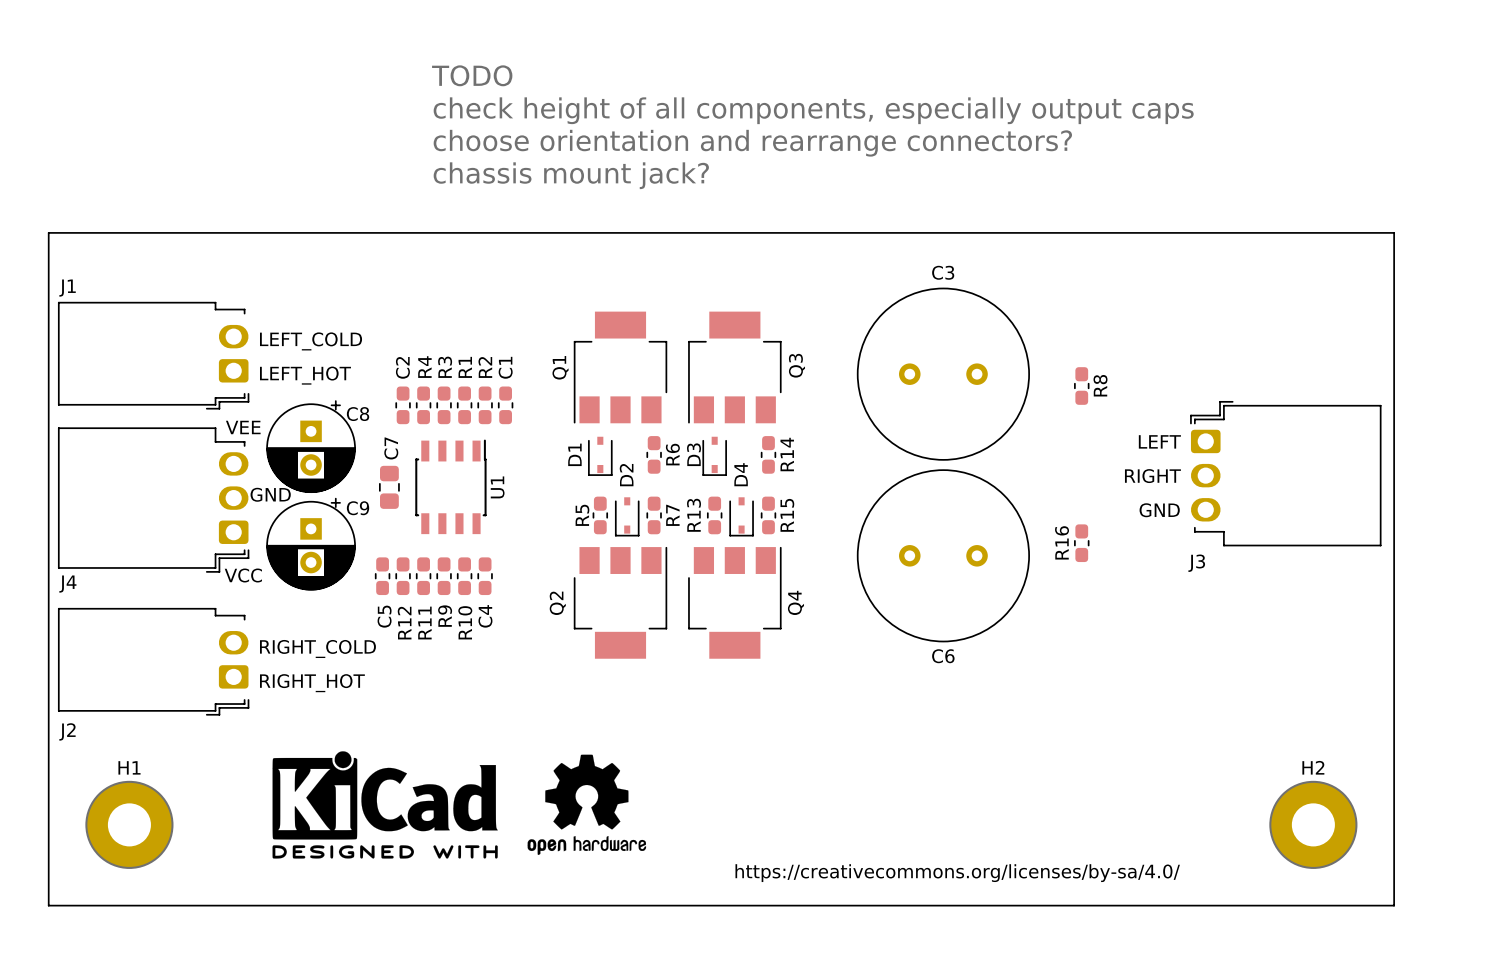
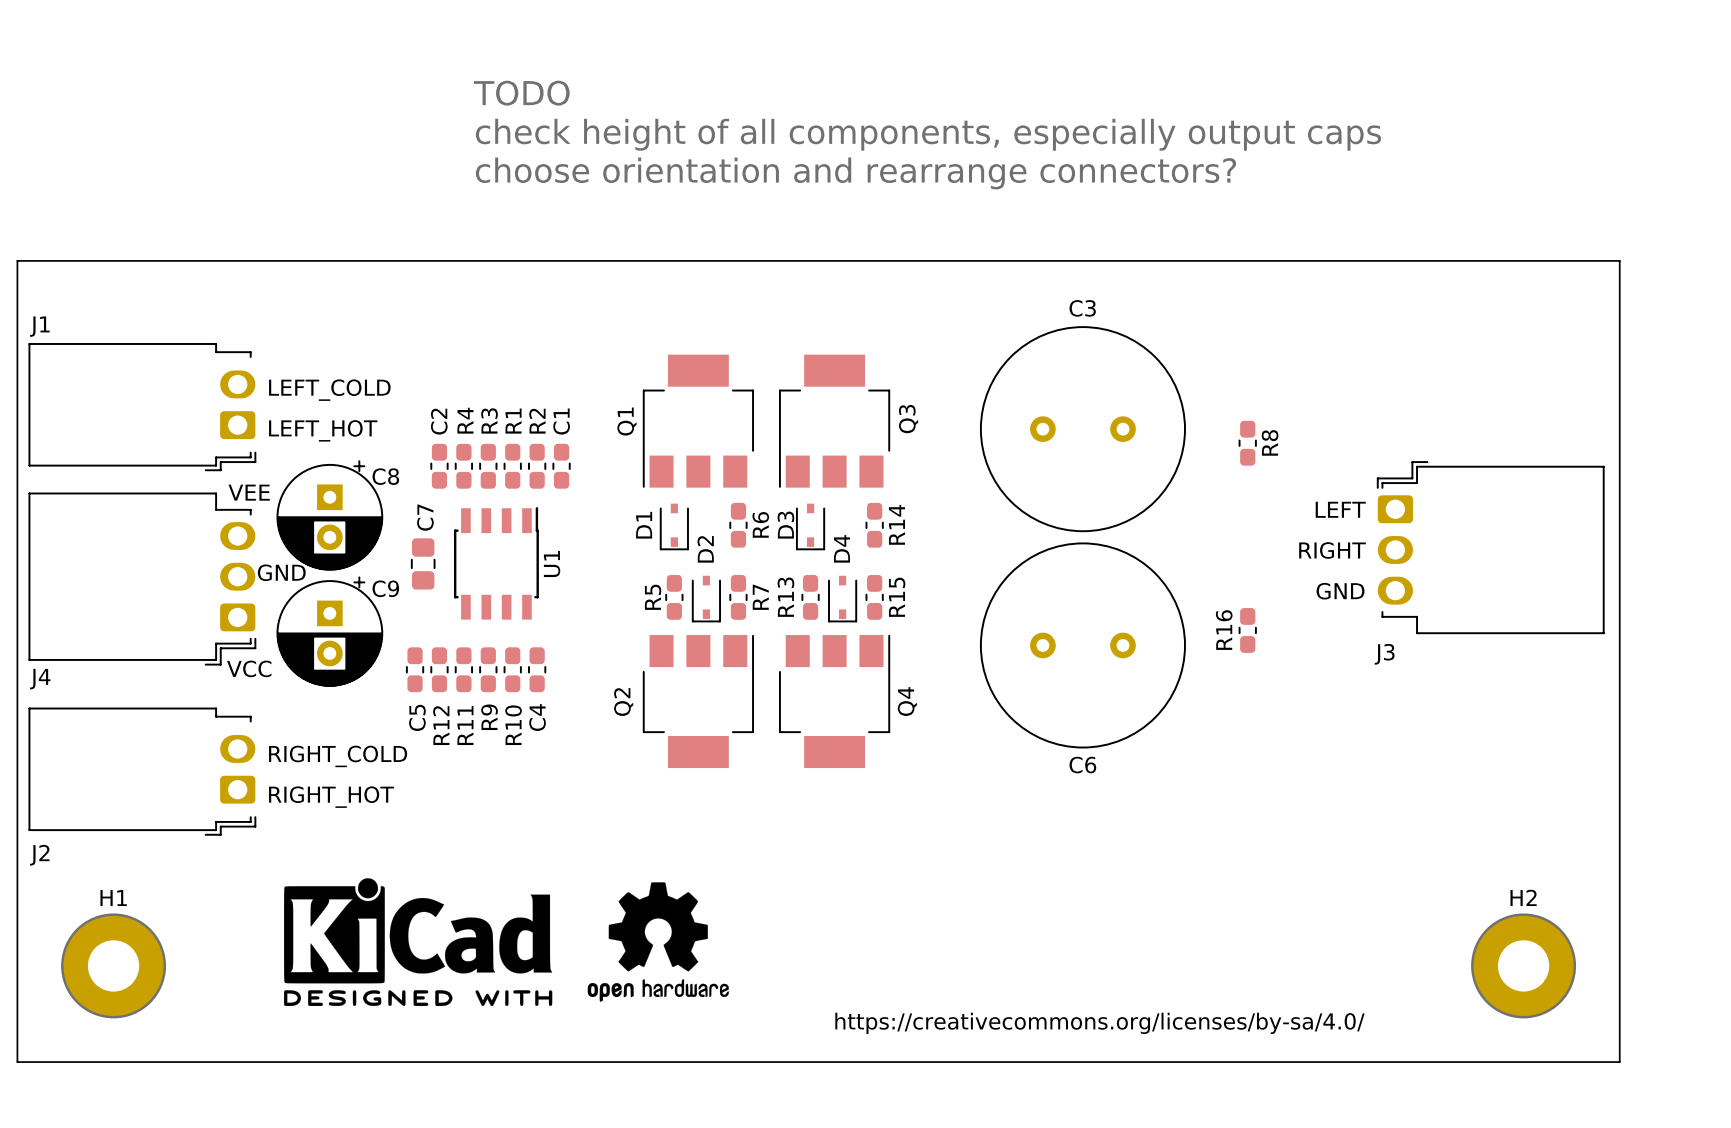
text position: TODO (472, 75) -> TODO (521, 93)
text position: check height of all components, especially output caps (813, 110) -> check height of all components, especially output caps (928, 134)
text position: choose orientation and rearrange connectors? (752, 143) -> choose orientation and rearrange connectors? (856, 173)
text: chassis mount jack? (571, 175) -> none

